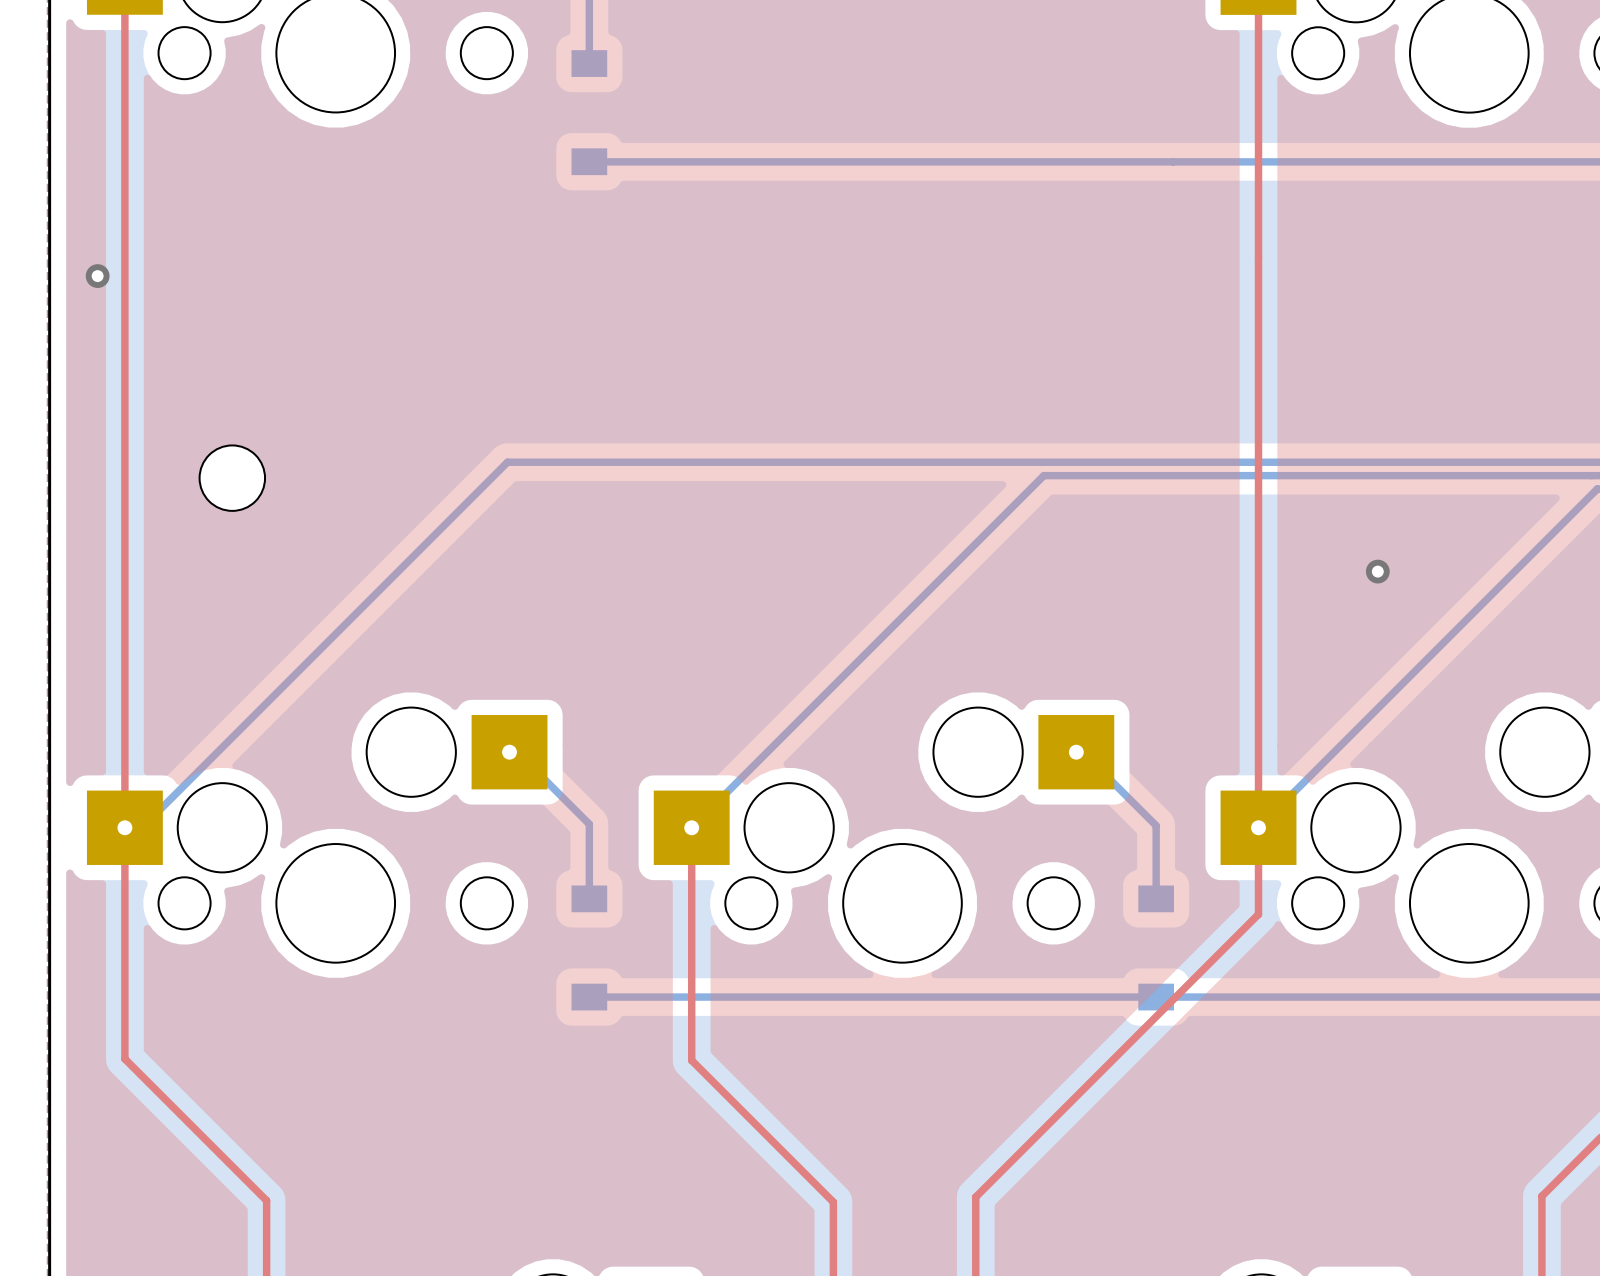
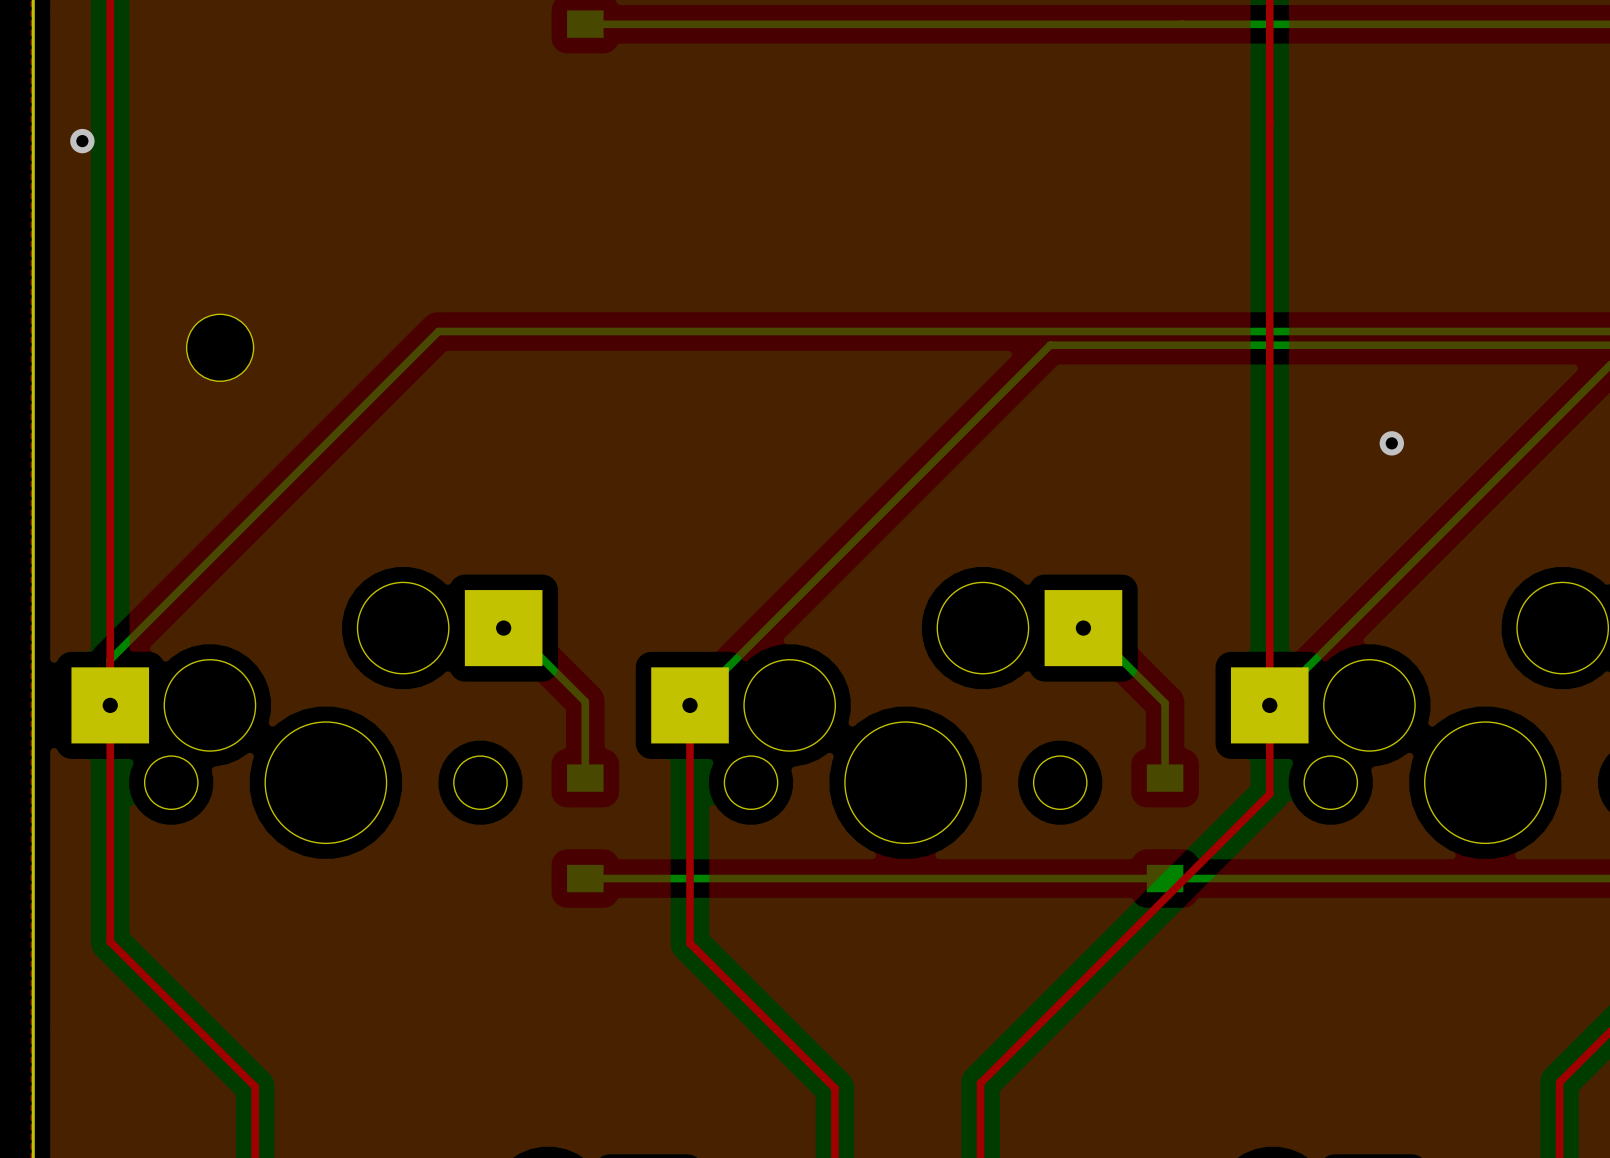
bottom track: (507, 462) (141, 827) (124, 827) -> (501, 331) (438, 331) (110, 659) (110, 705)

